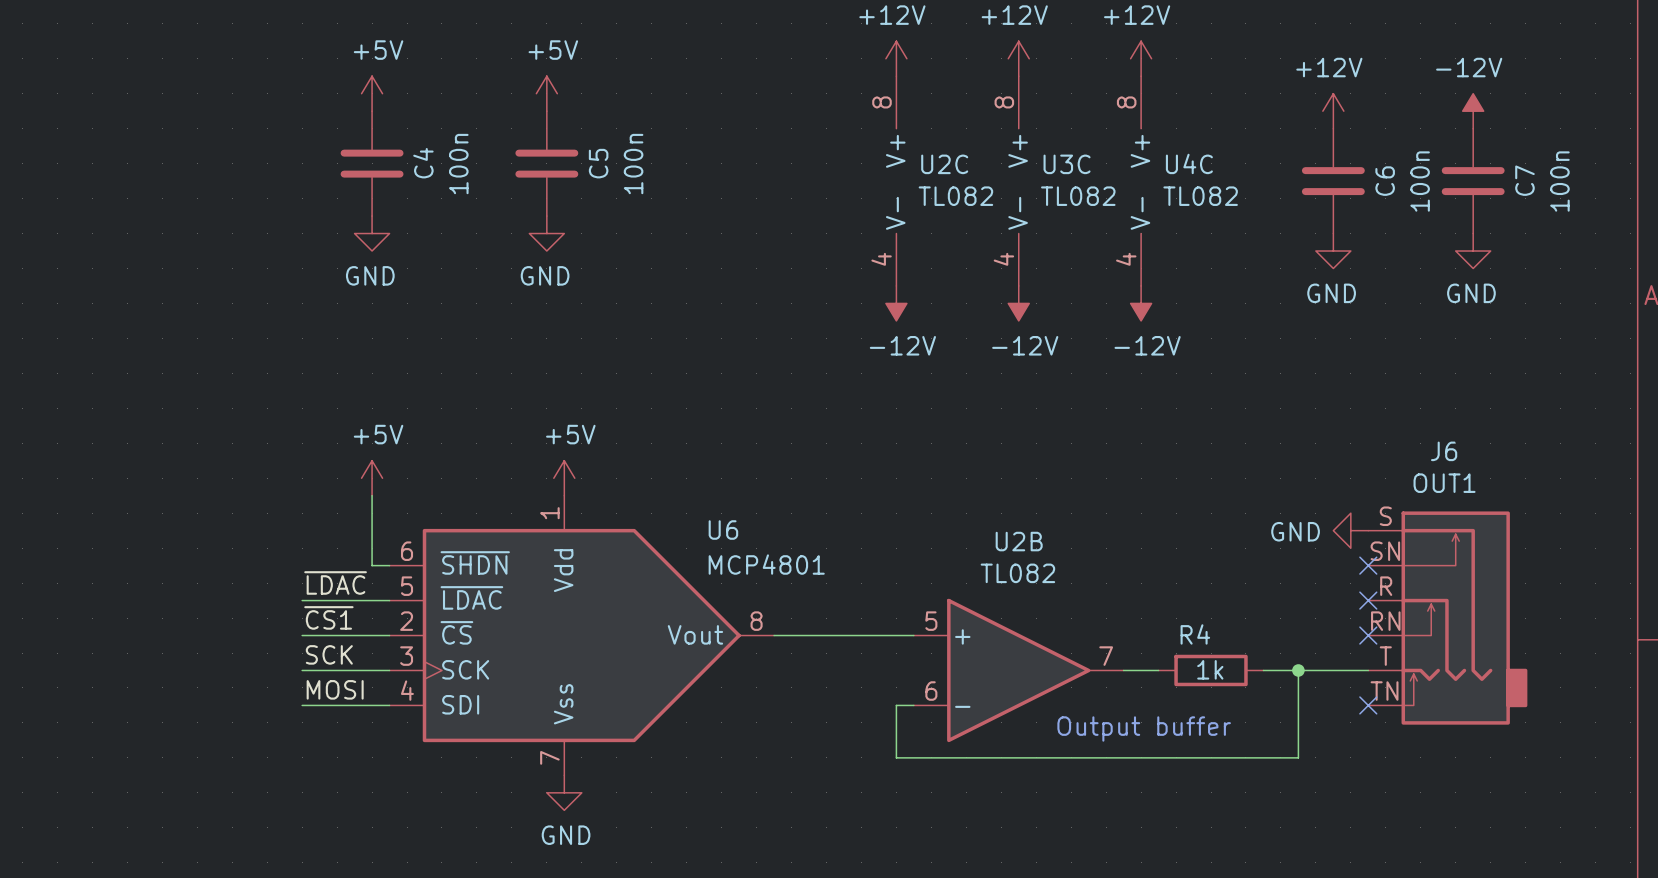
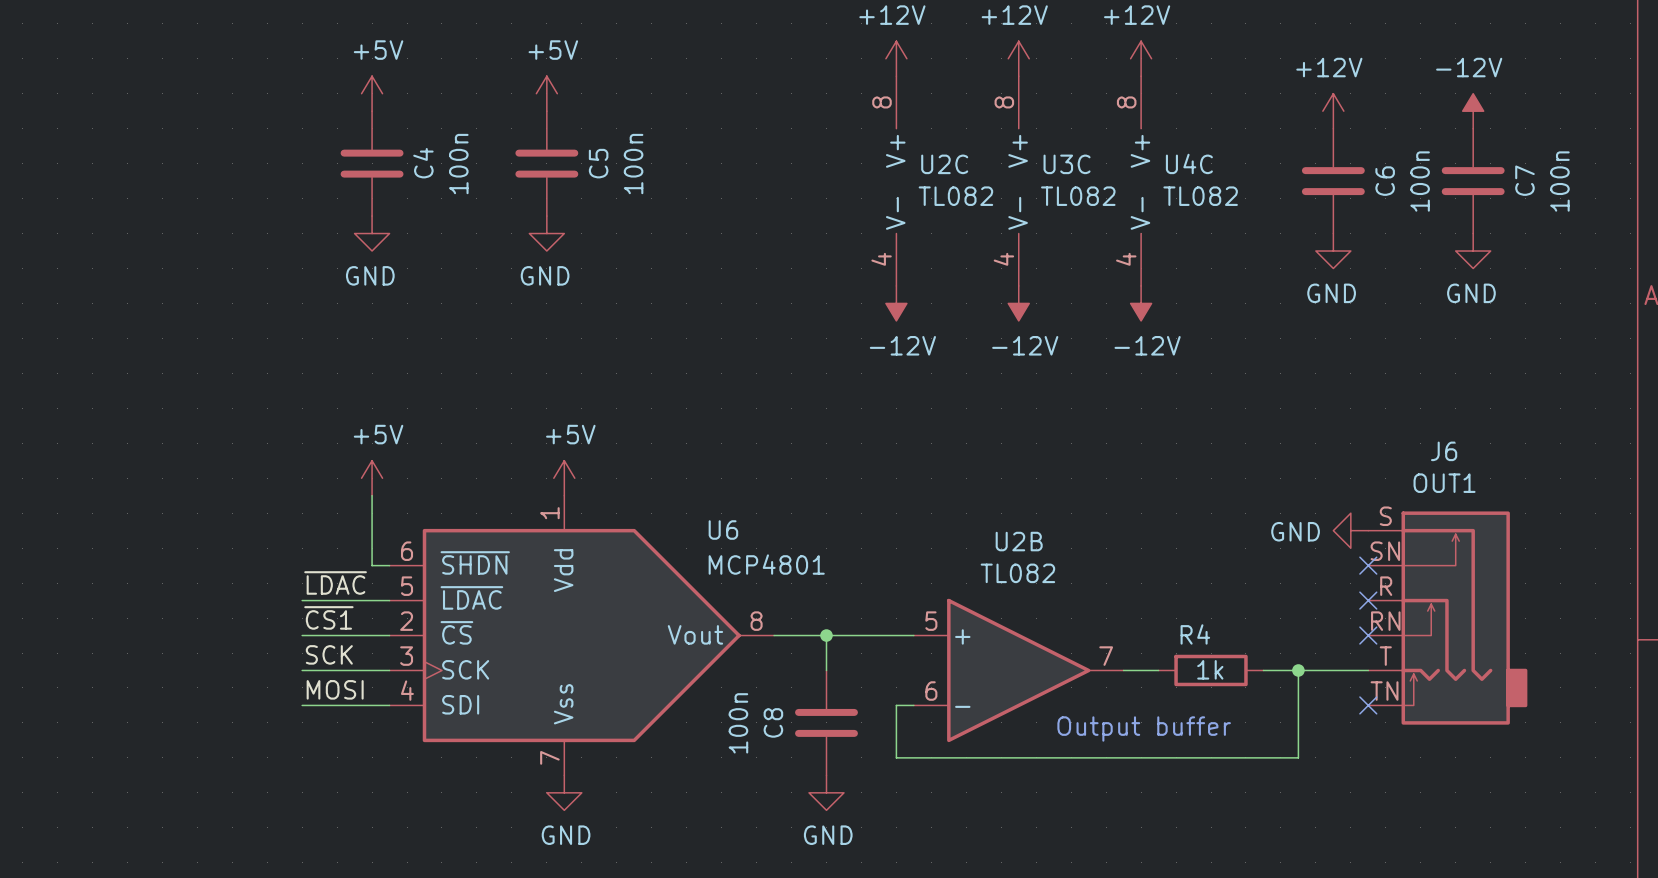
wire: none -> (826, 635) (826, 670)
junction: none -> (826, 635)
C8: none -> 100n (826, 722)
power symbol: none -> GND (826, 792)

